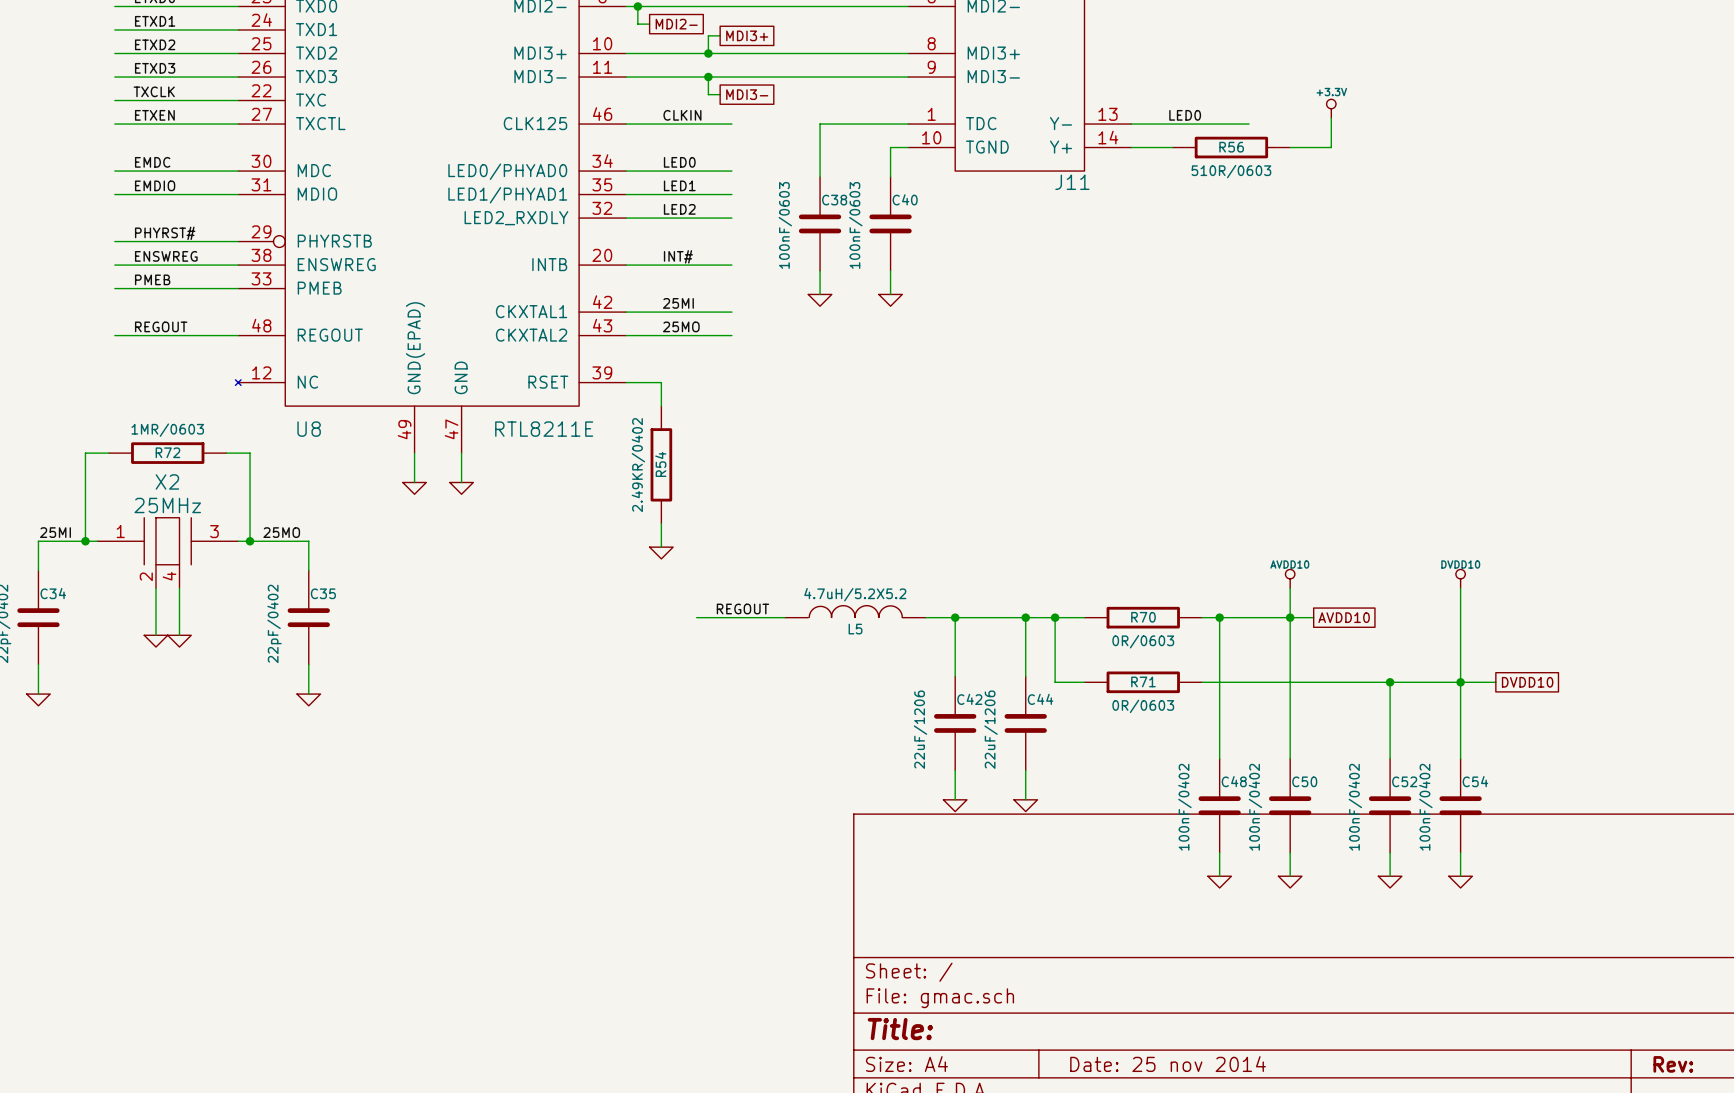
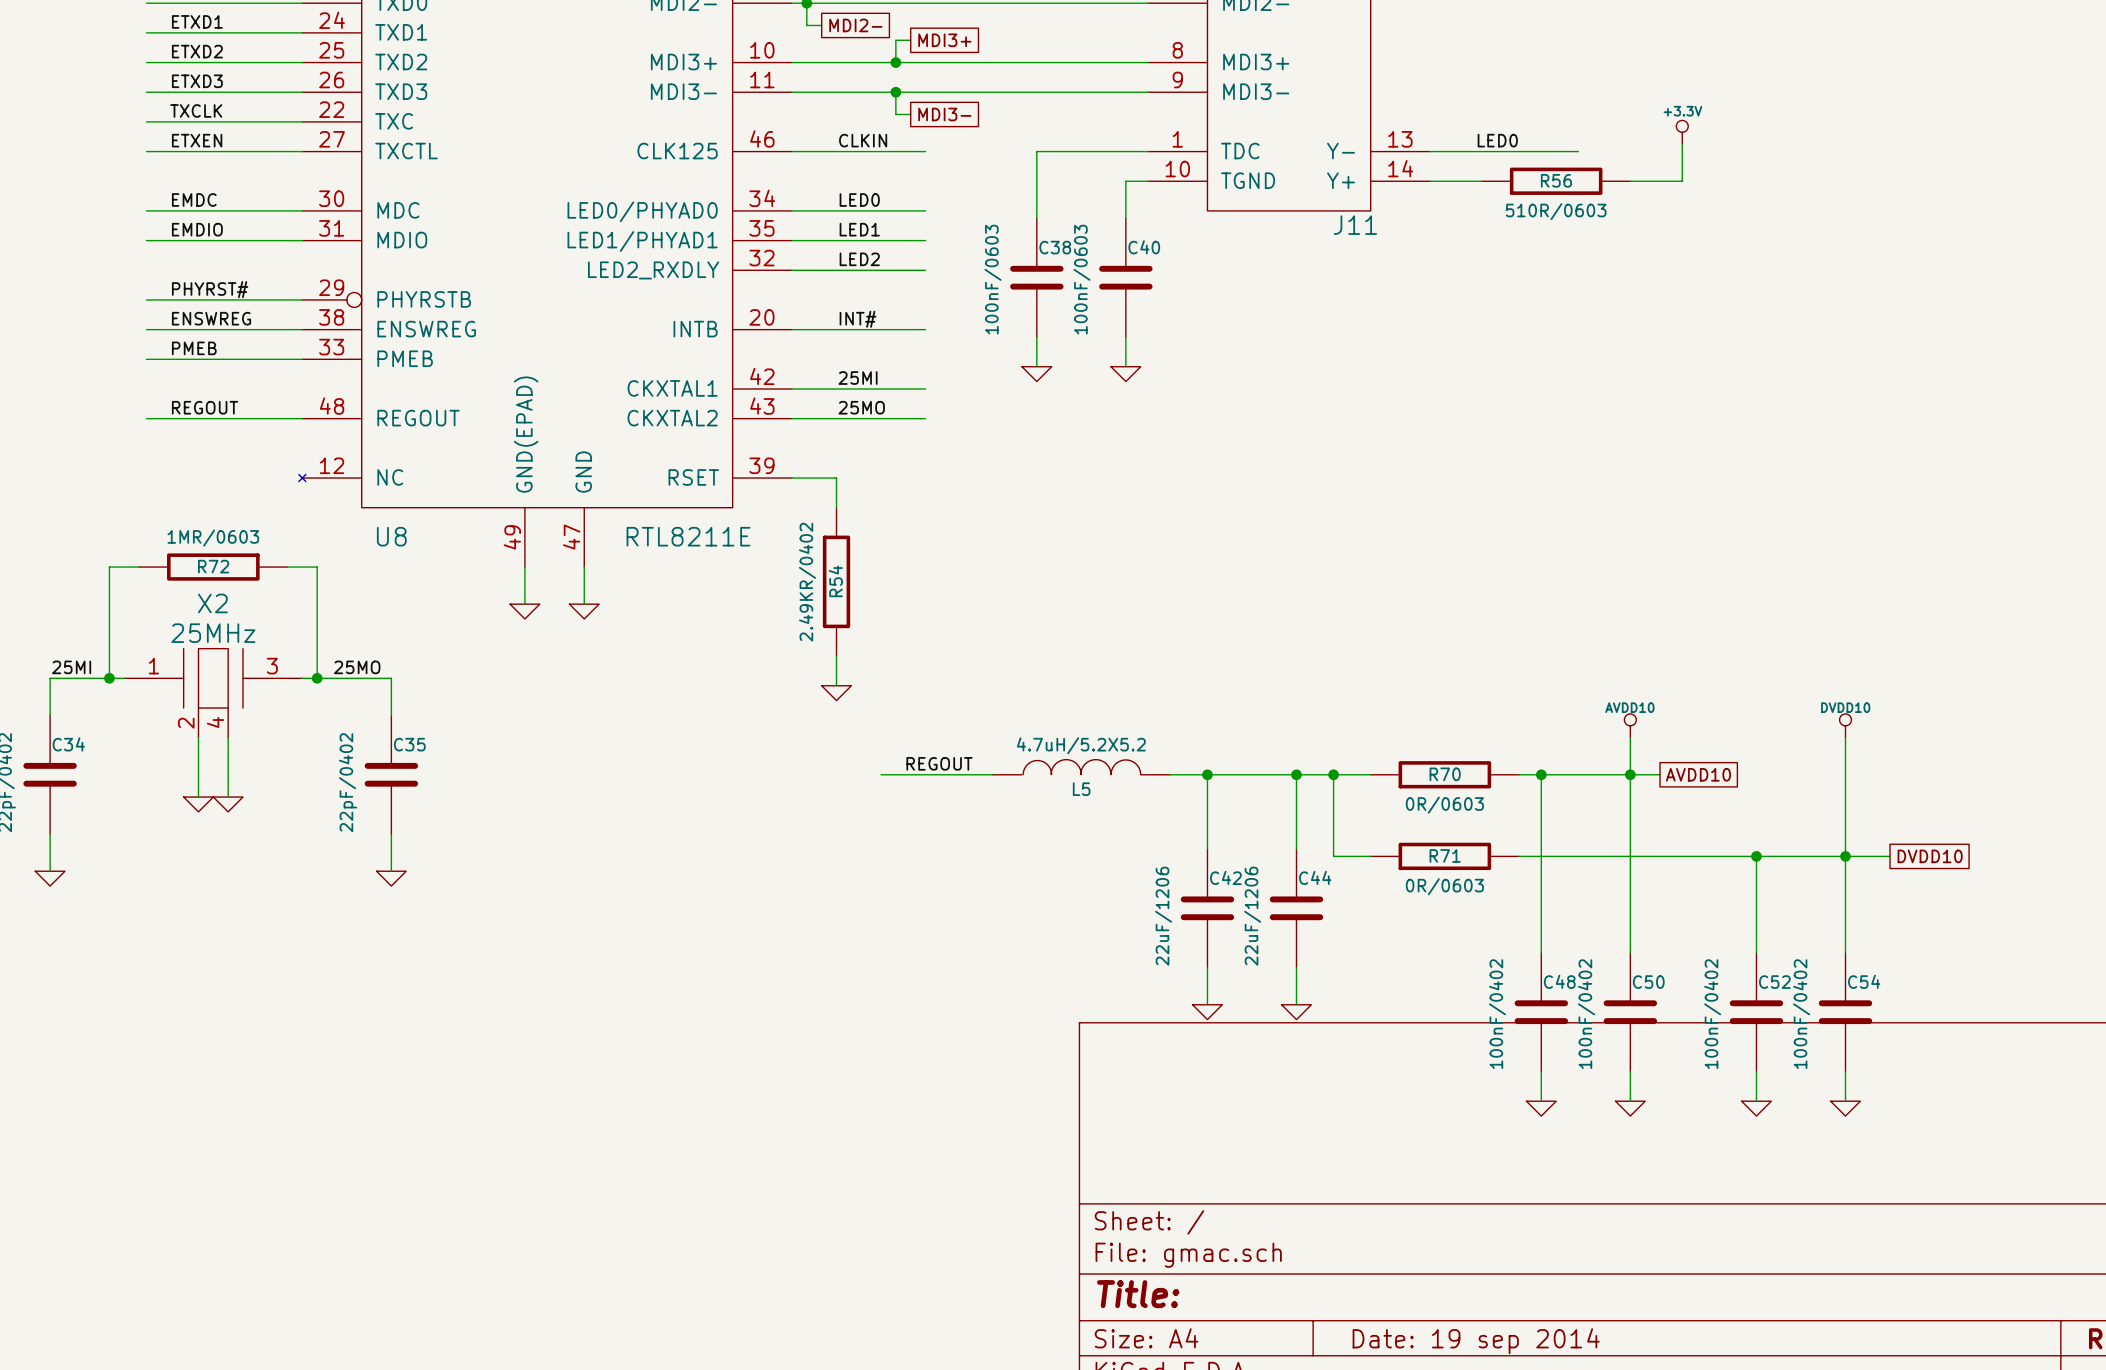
title block: Date: 25 nov 2014 (1168, 1064) -> Date: 19 sep 2014 (1476, 1341)

